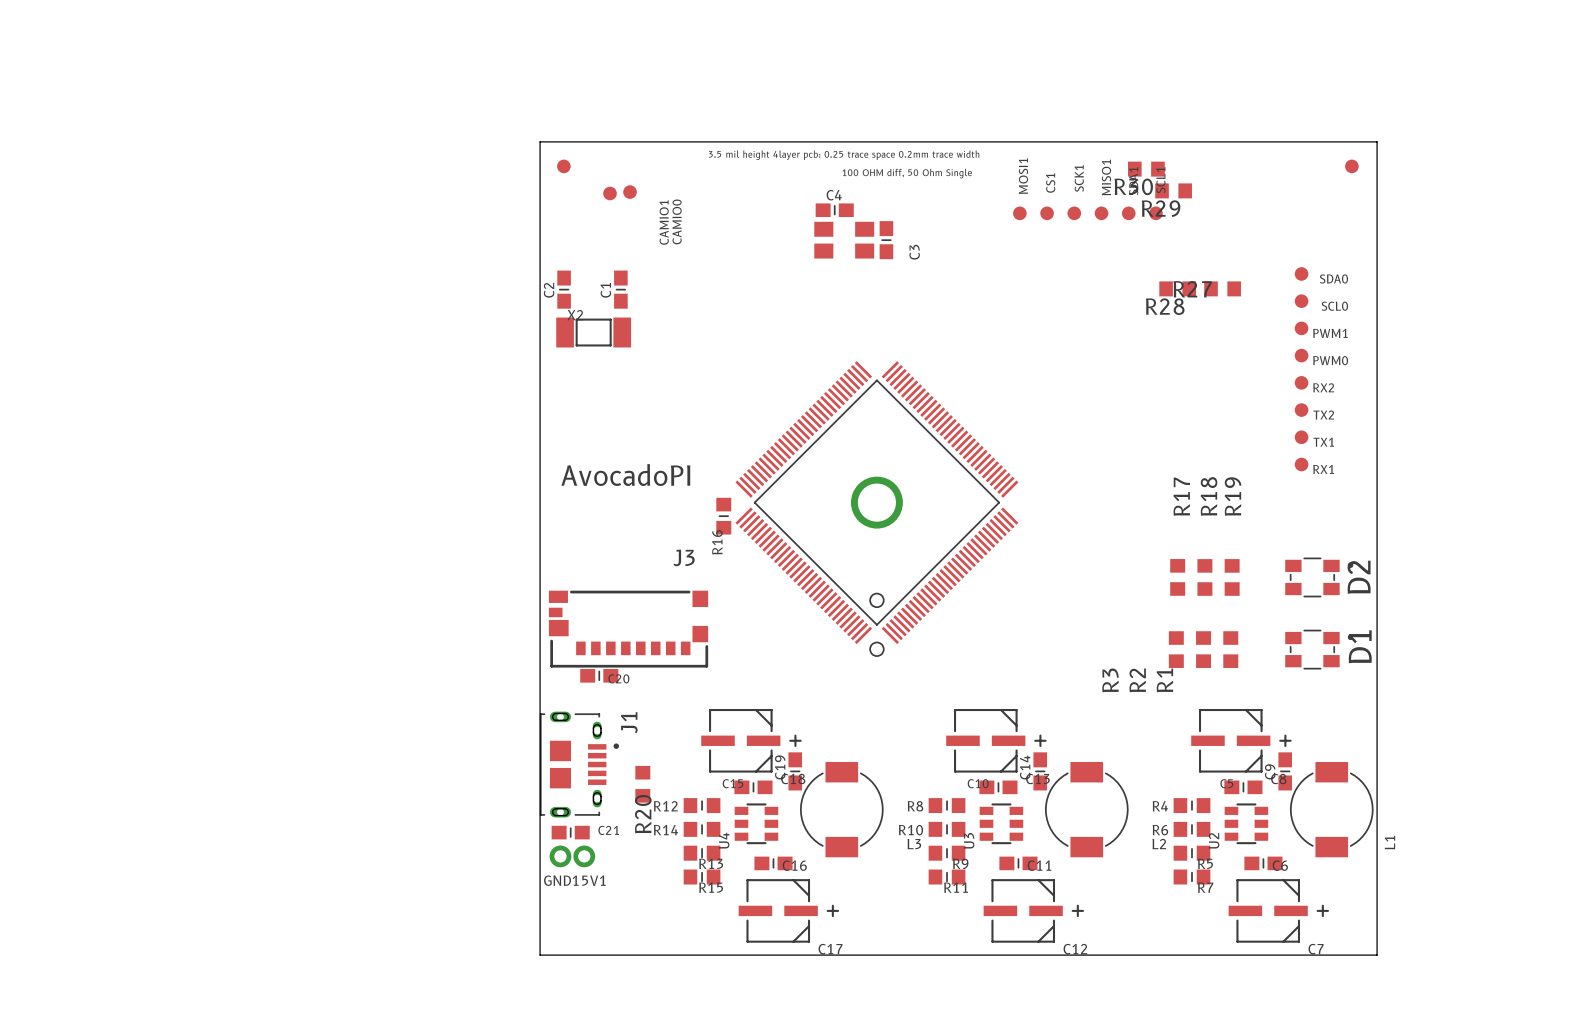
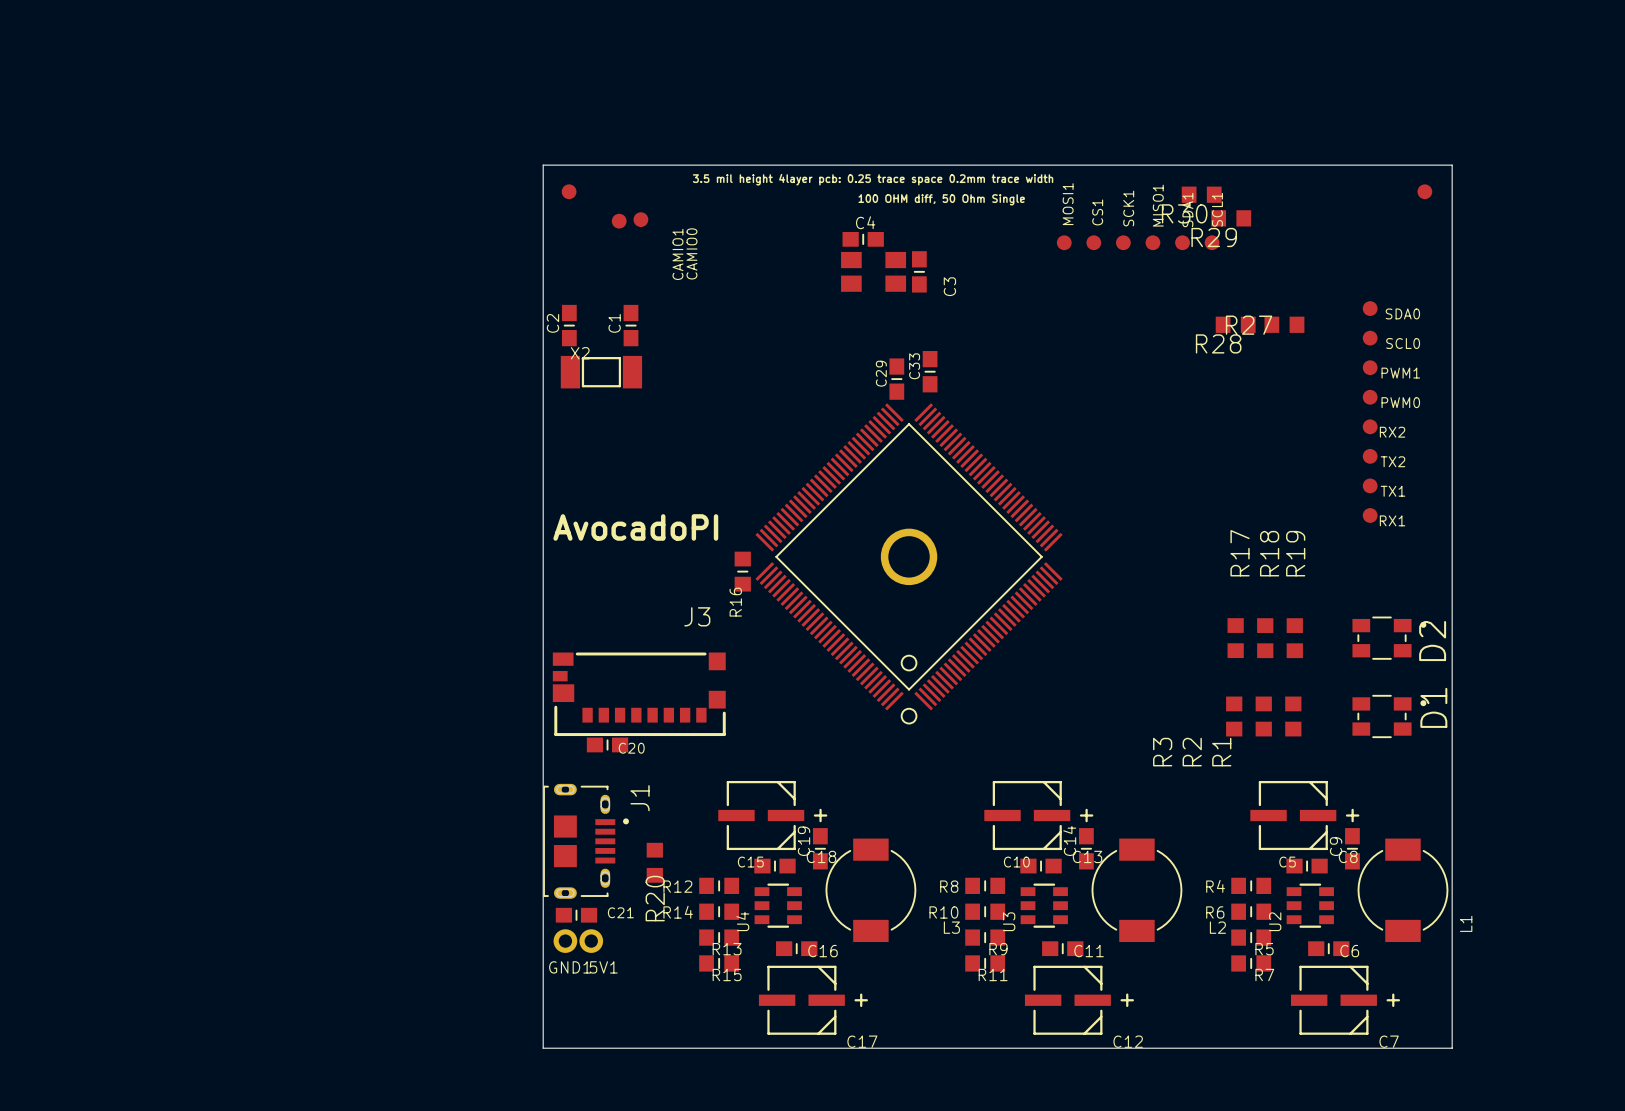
C33: none -> (930, 371)
C29: none -> (896, 379)

